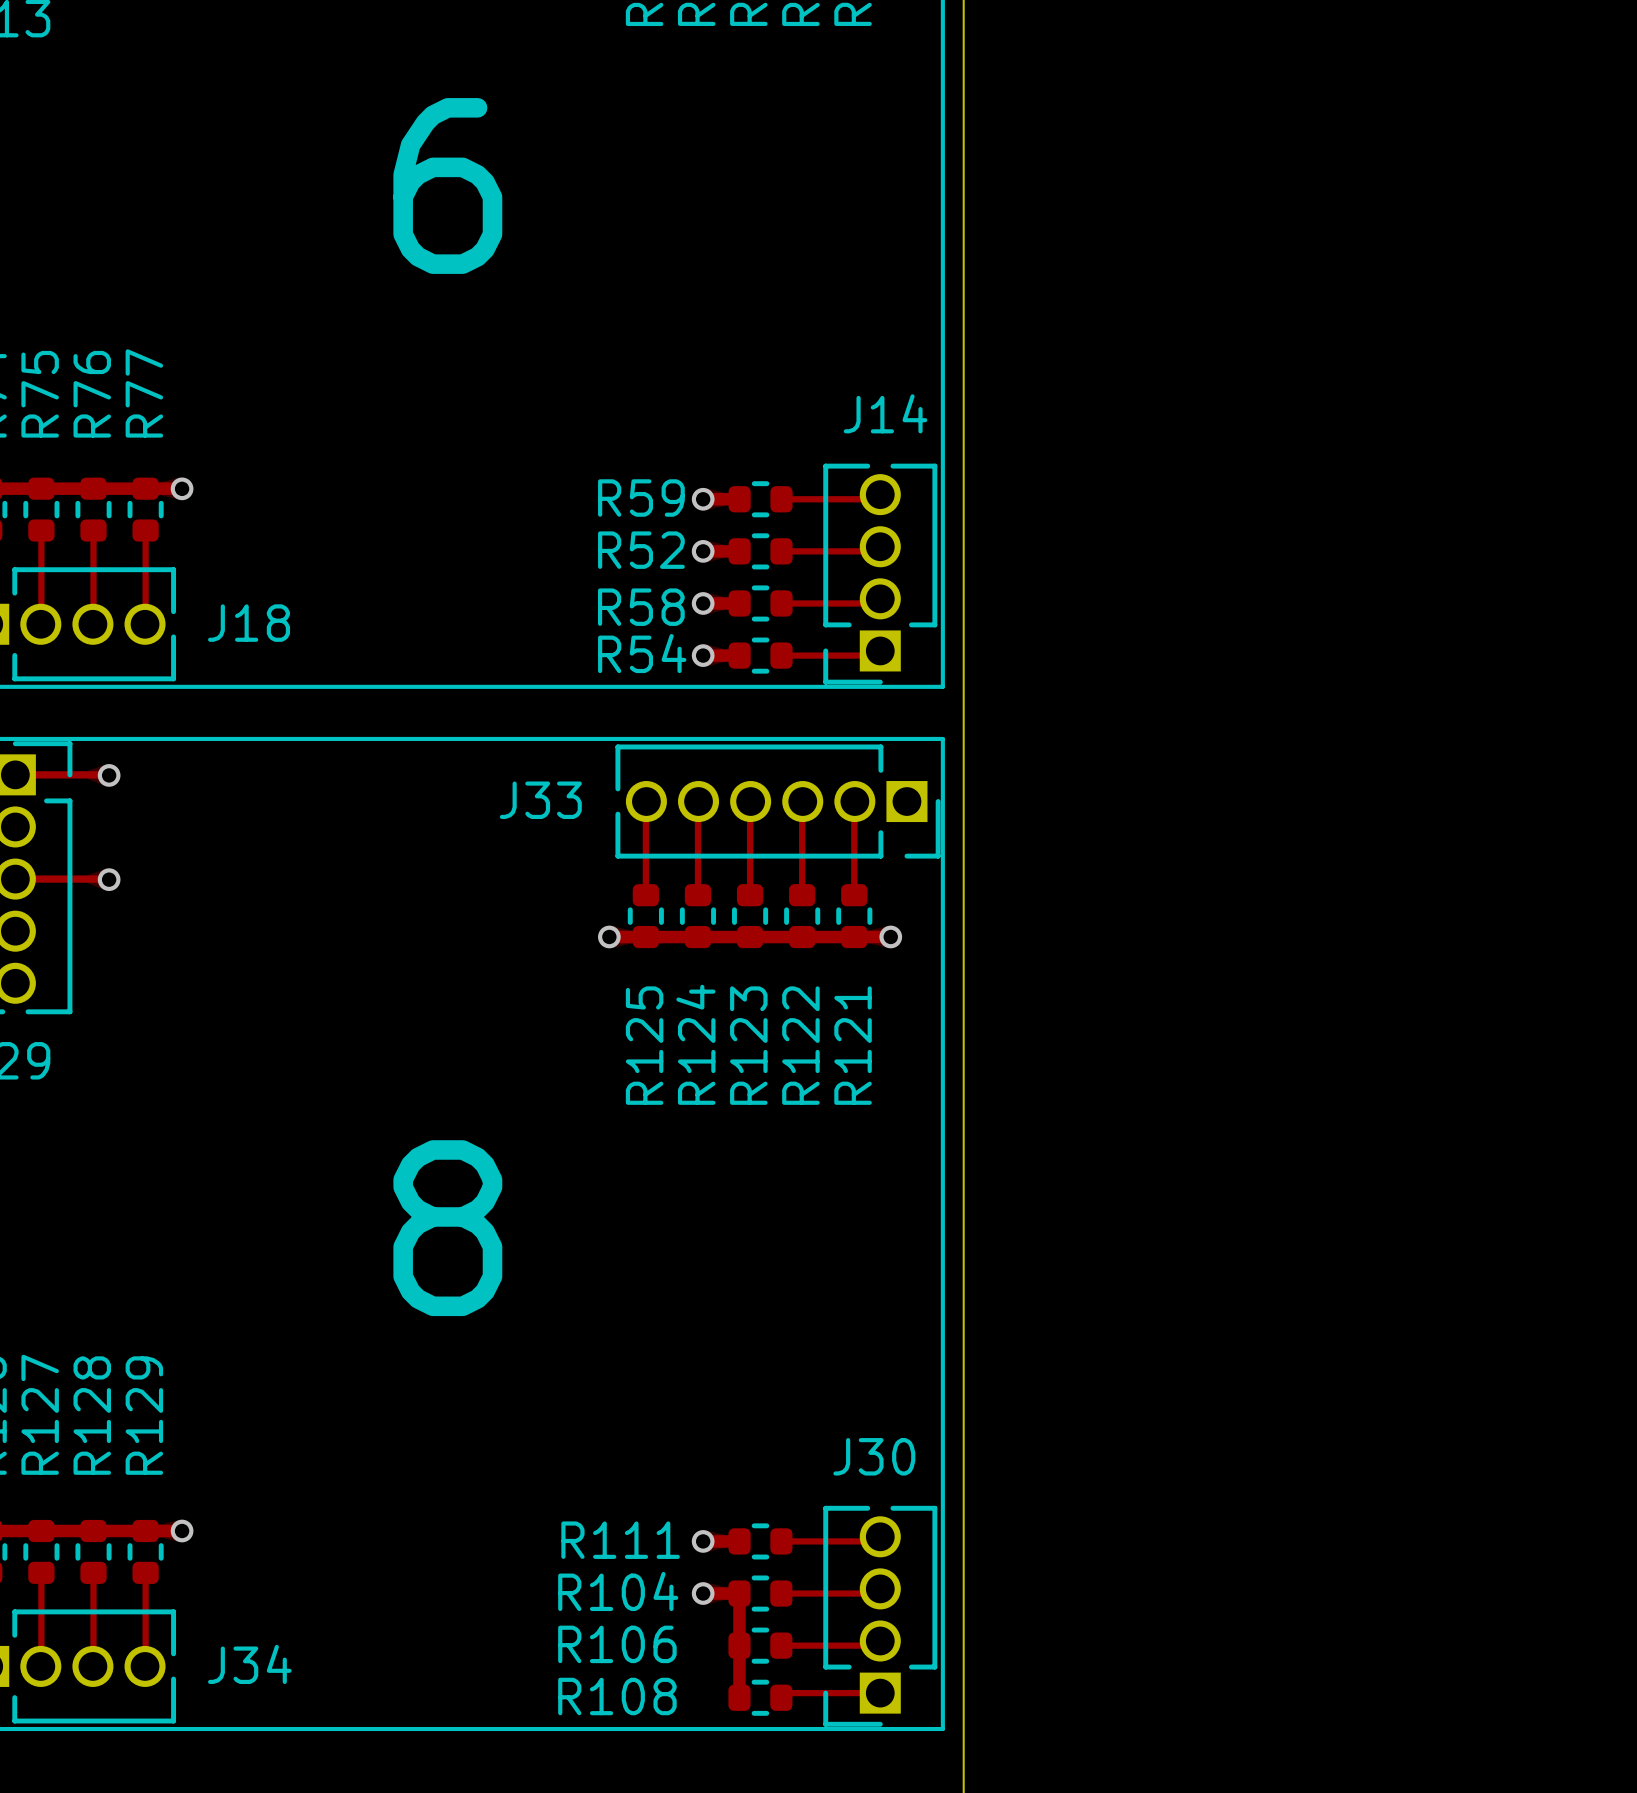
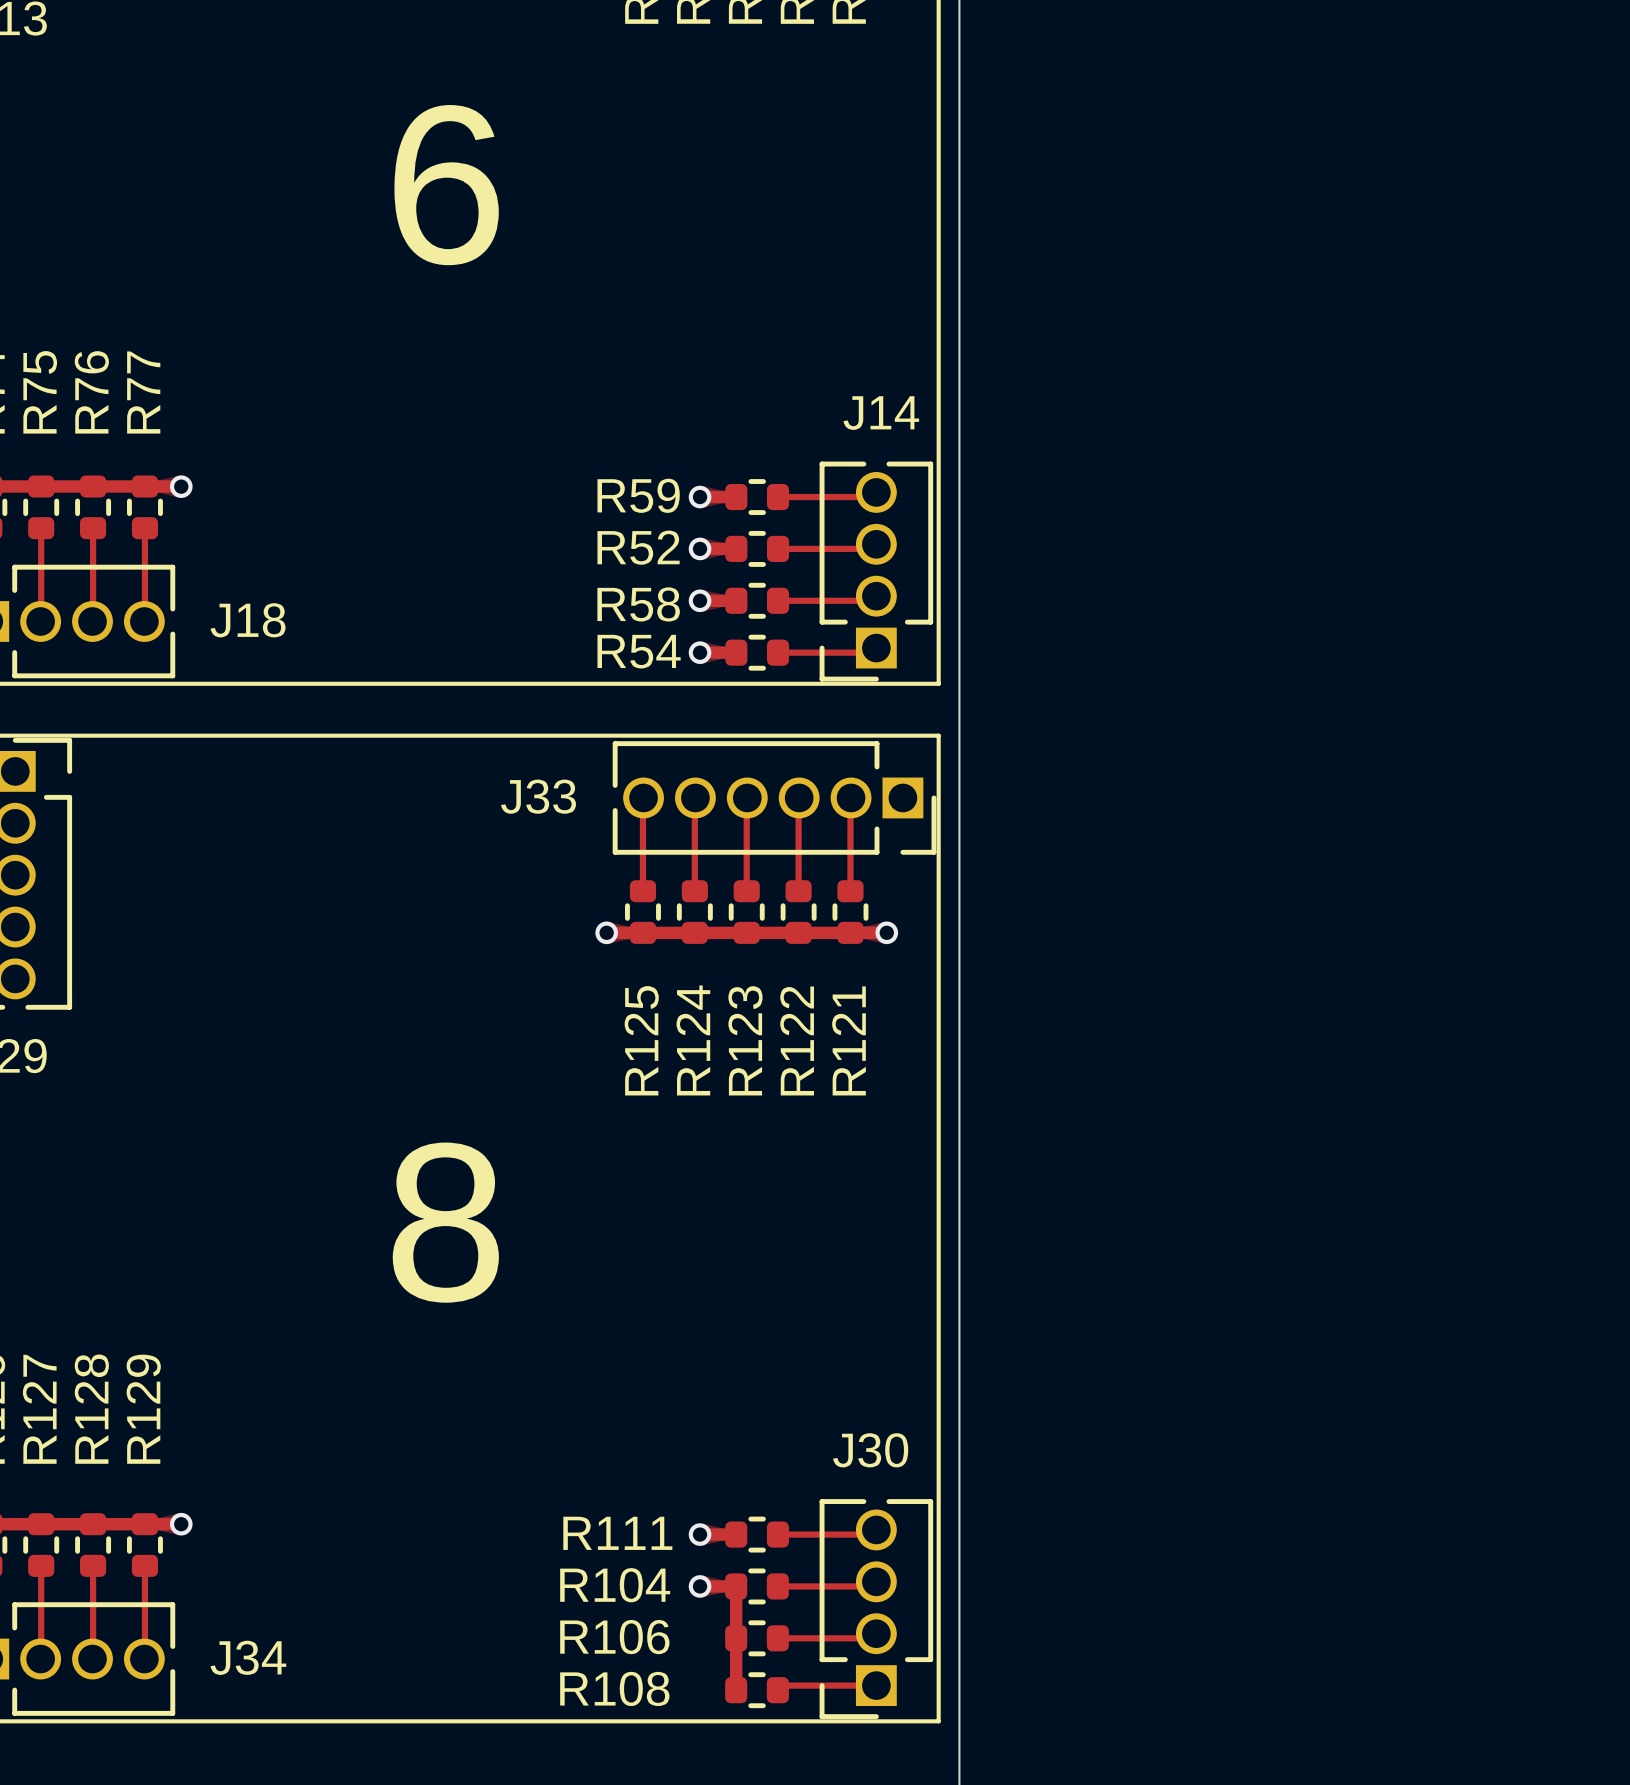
track: (15, 774) (108, 774) -> none
via: (109, 775) -> none
track: (15, 879) (108, 879) -> none
via: (109, 879) -> none

